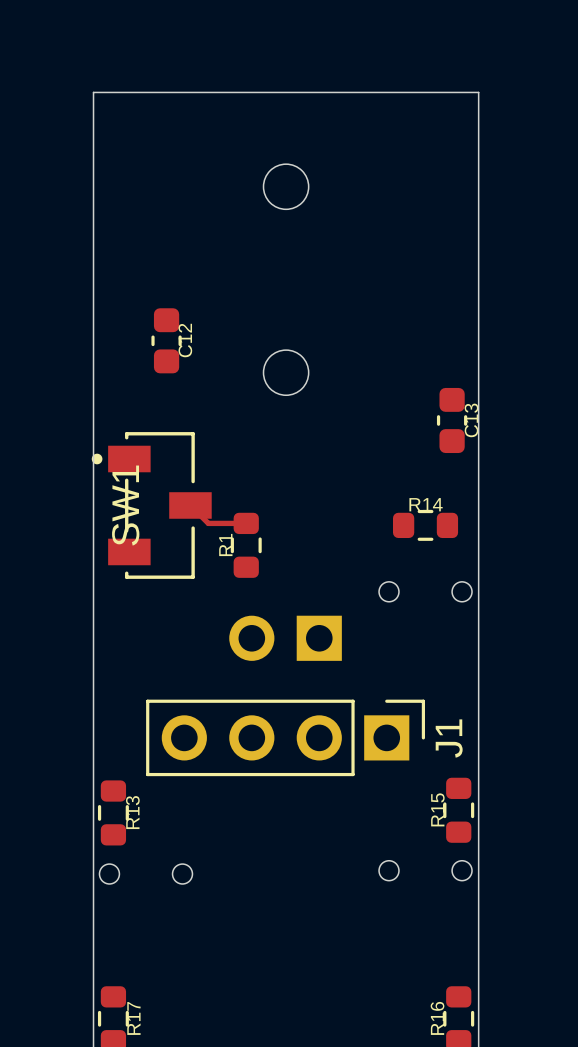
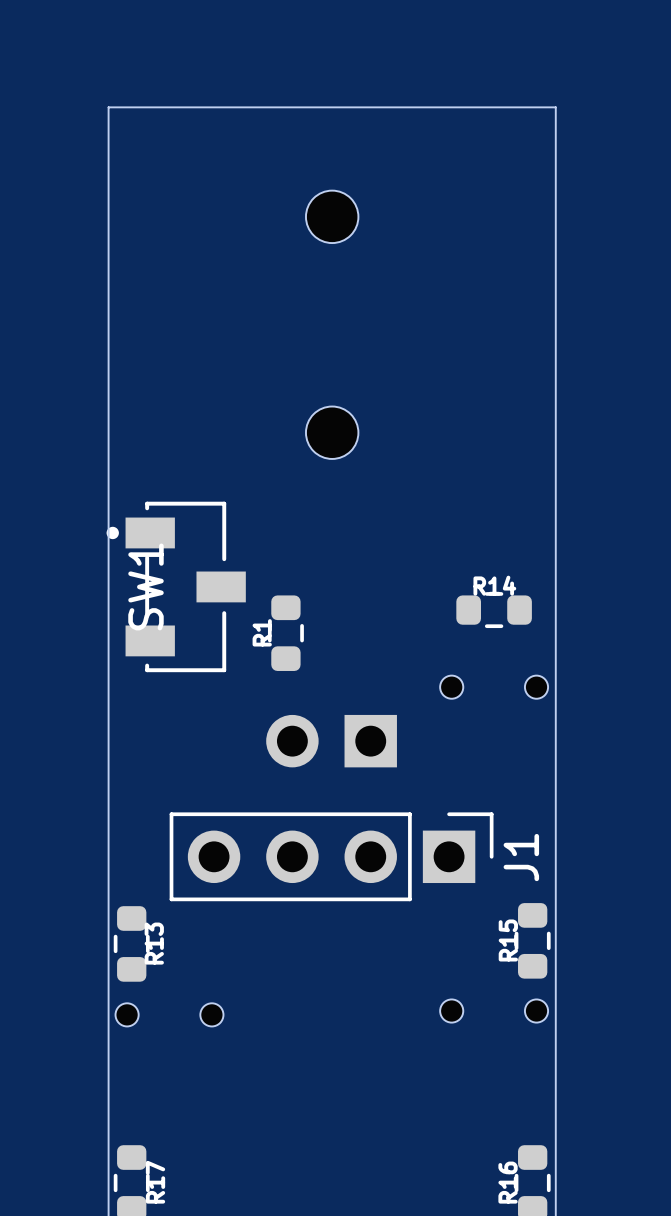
C12: (166, 340) -> none
C13: (452, 420) -> none
track: (190, 505) (208, 523) (246, 523) -> none

